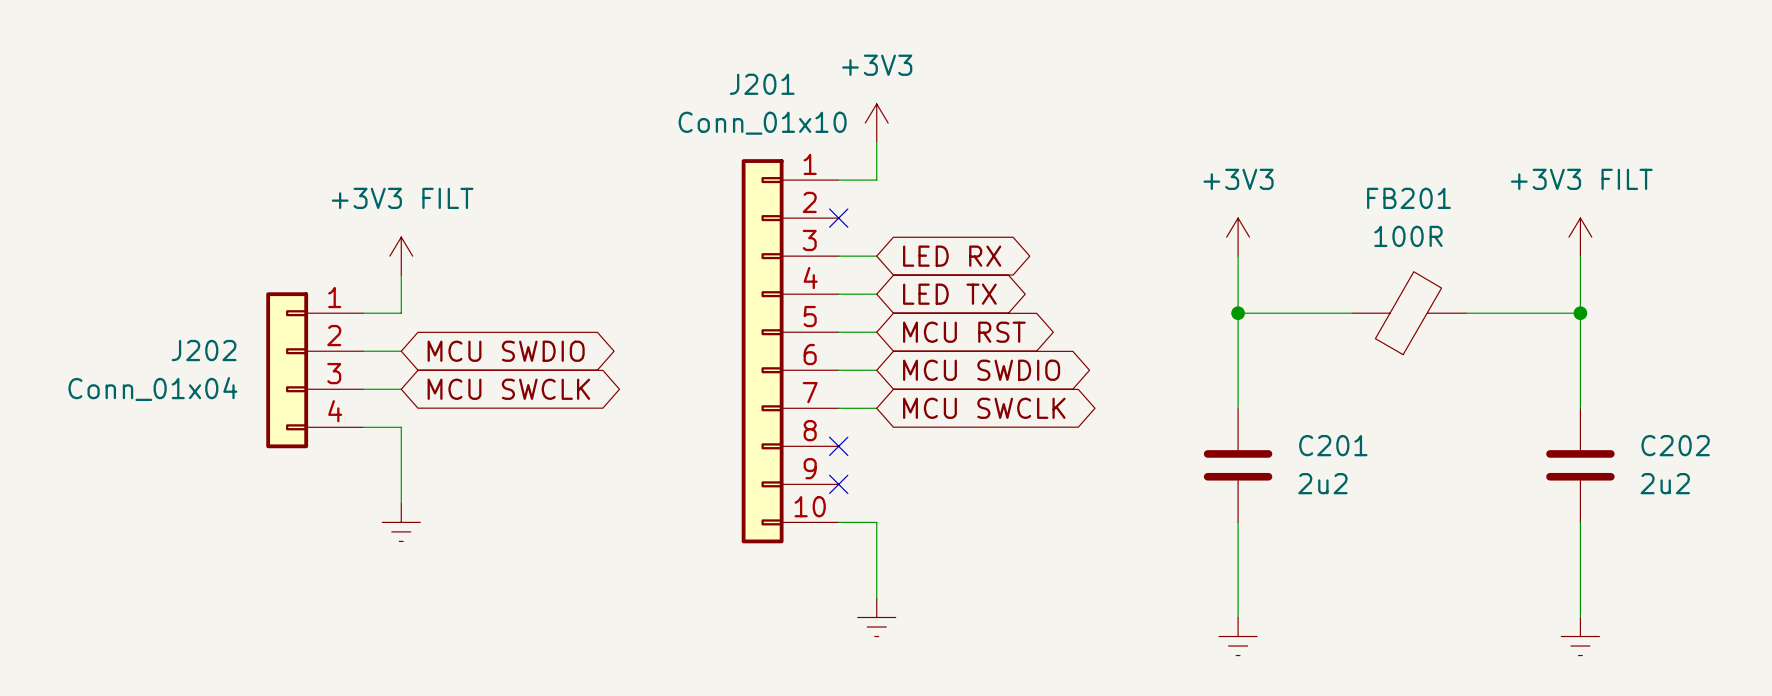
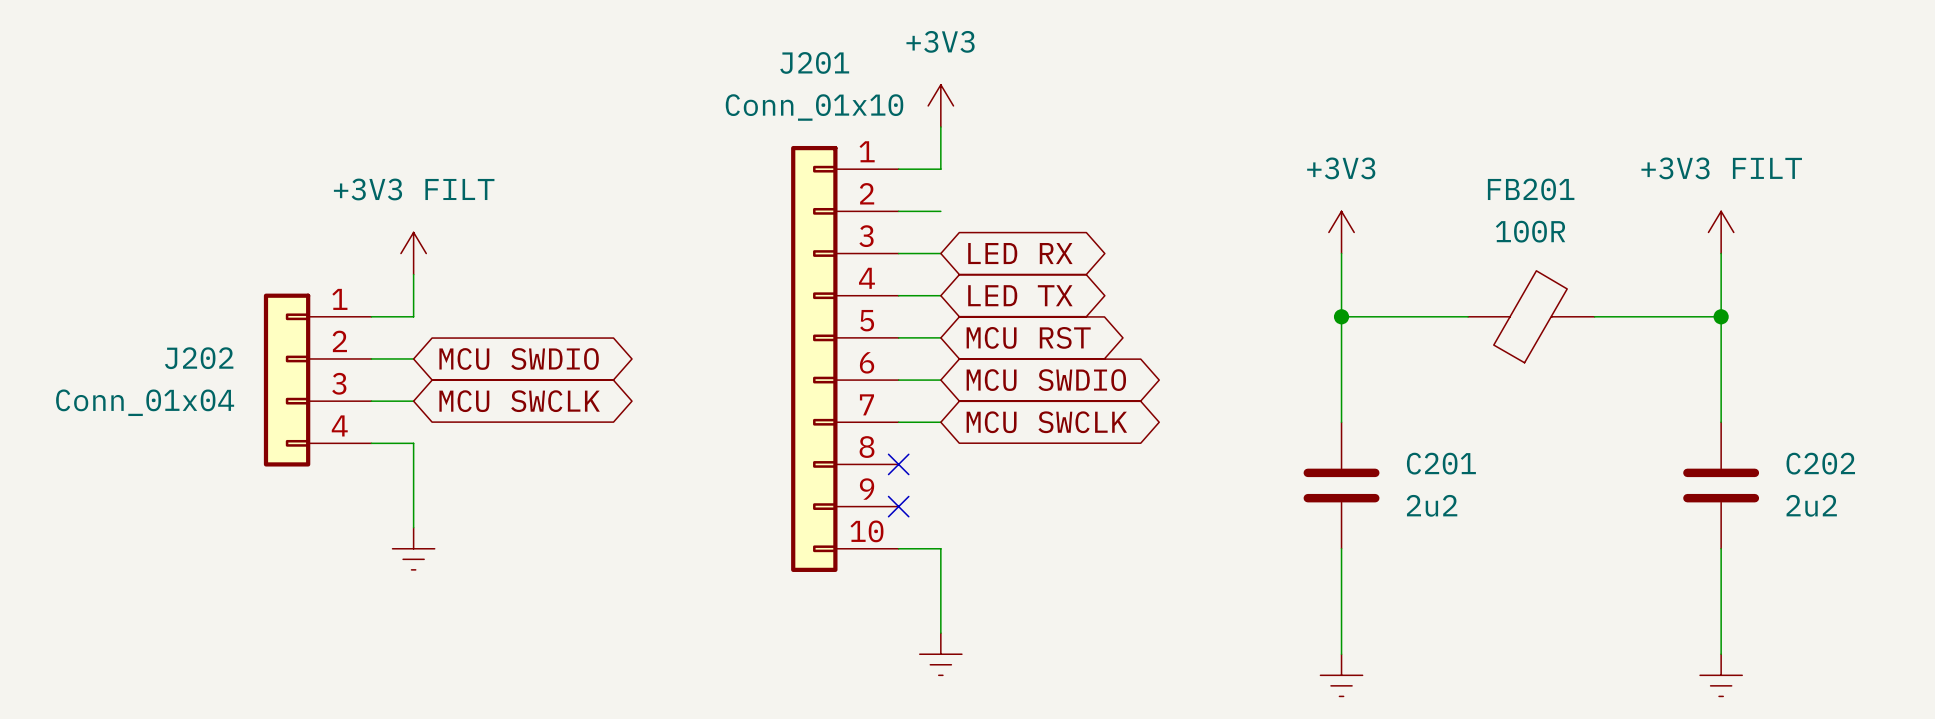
wire: none -> (898, 211) (940, 211)
no-connect mark: (838, 218) -> none

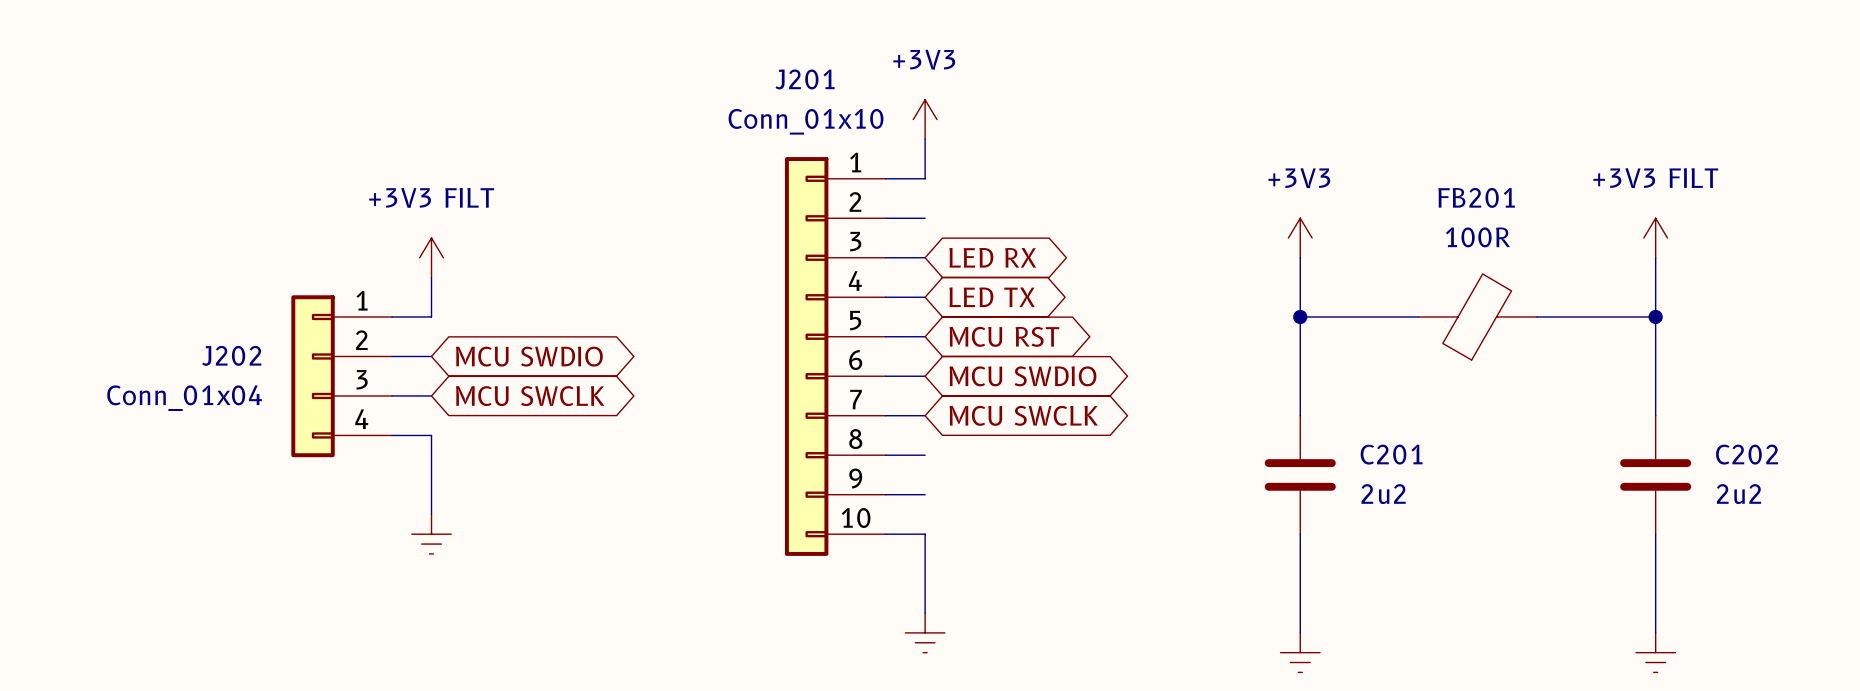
wire: none -> (885, 455) (925, 455)
no-connect mark: (898, 464) -> none
wire: none -> (885, 494) (925, 494)
no-connect mark: (898, 506) -> none

